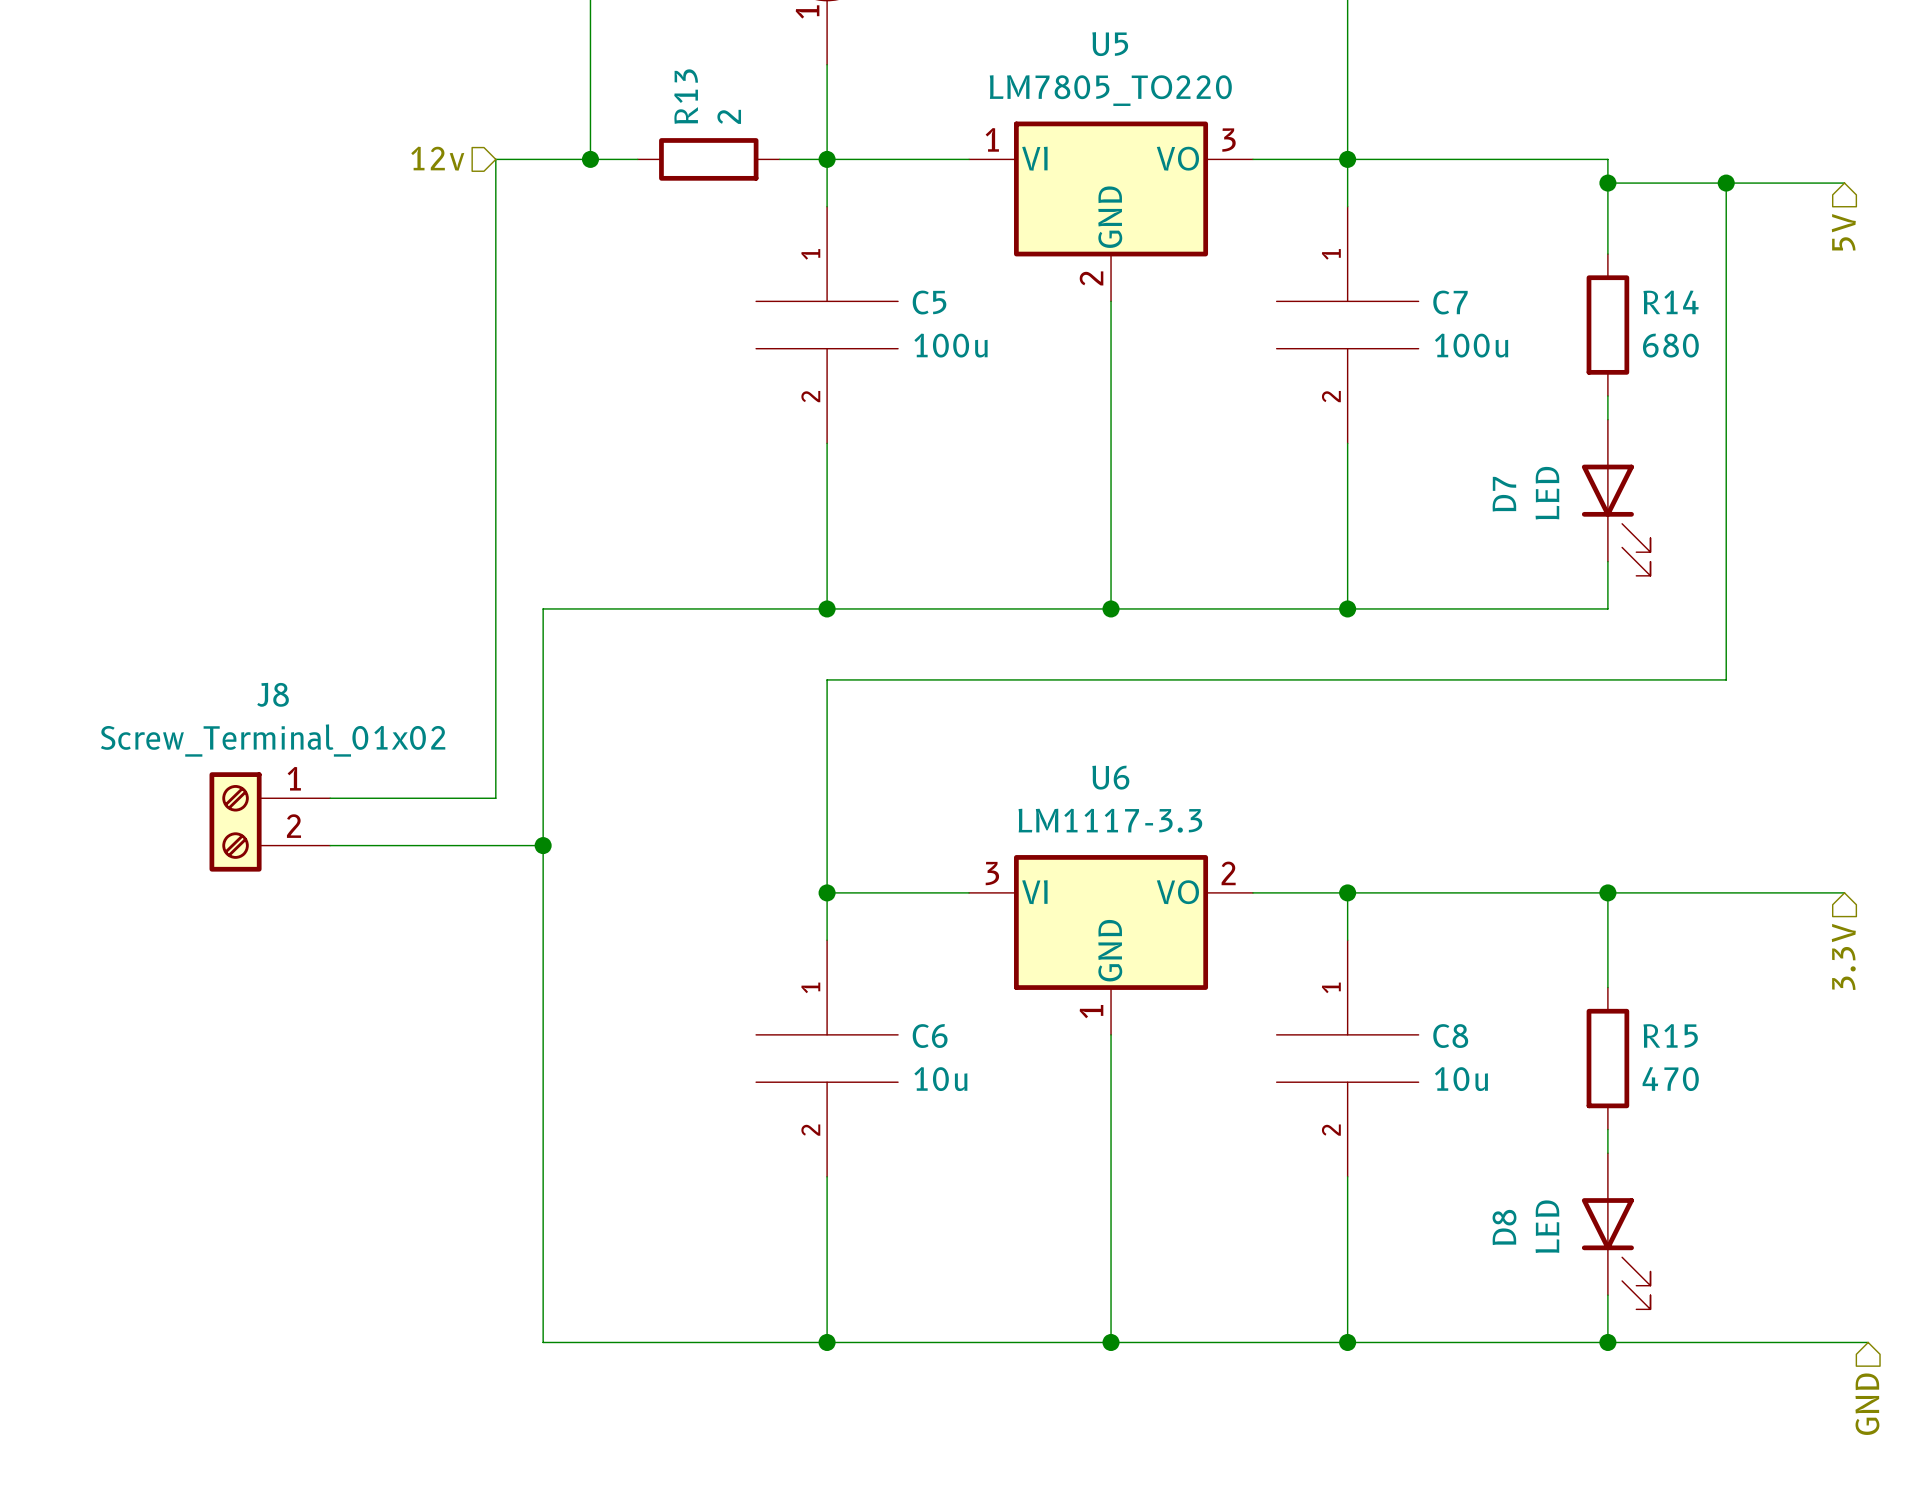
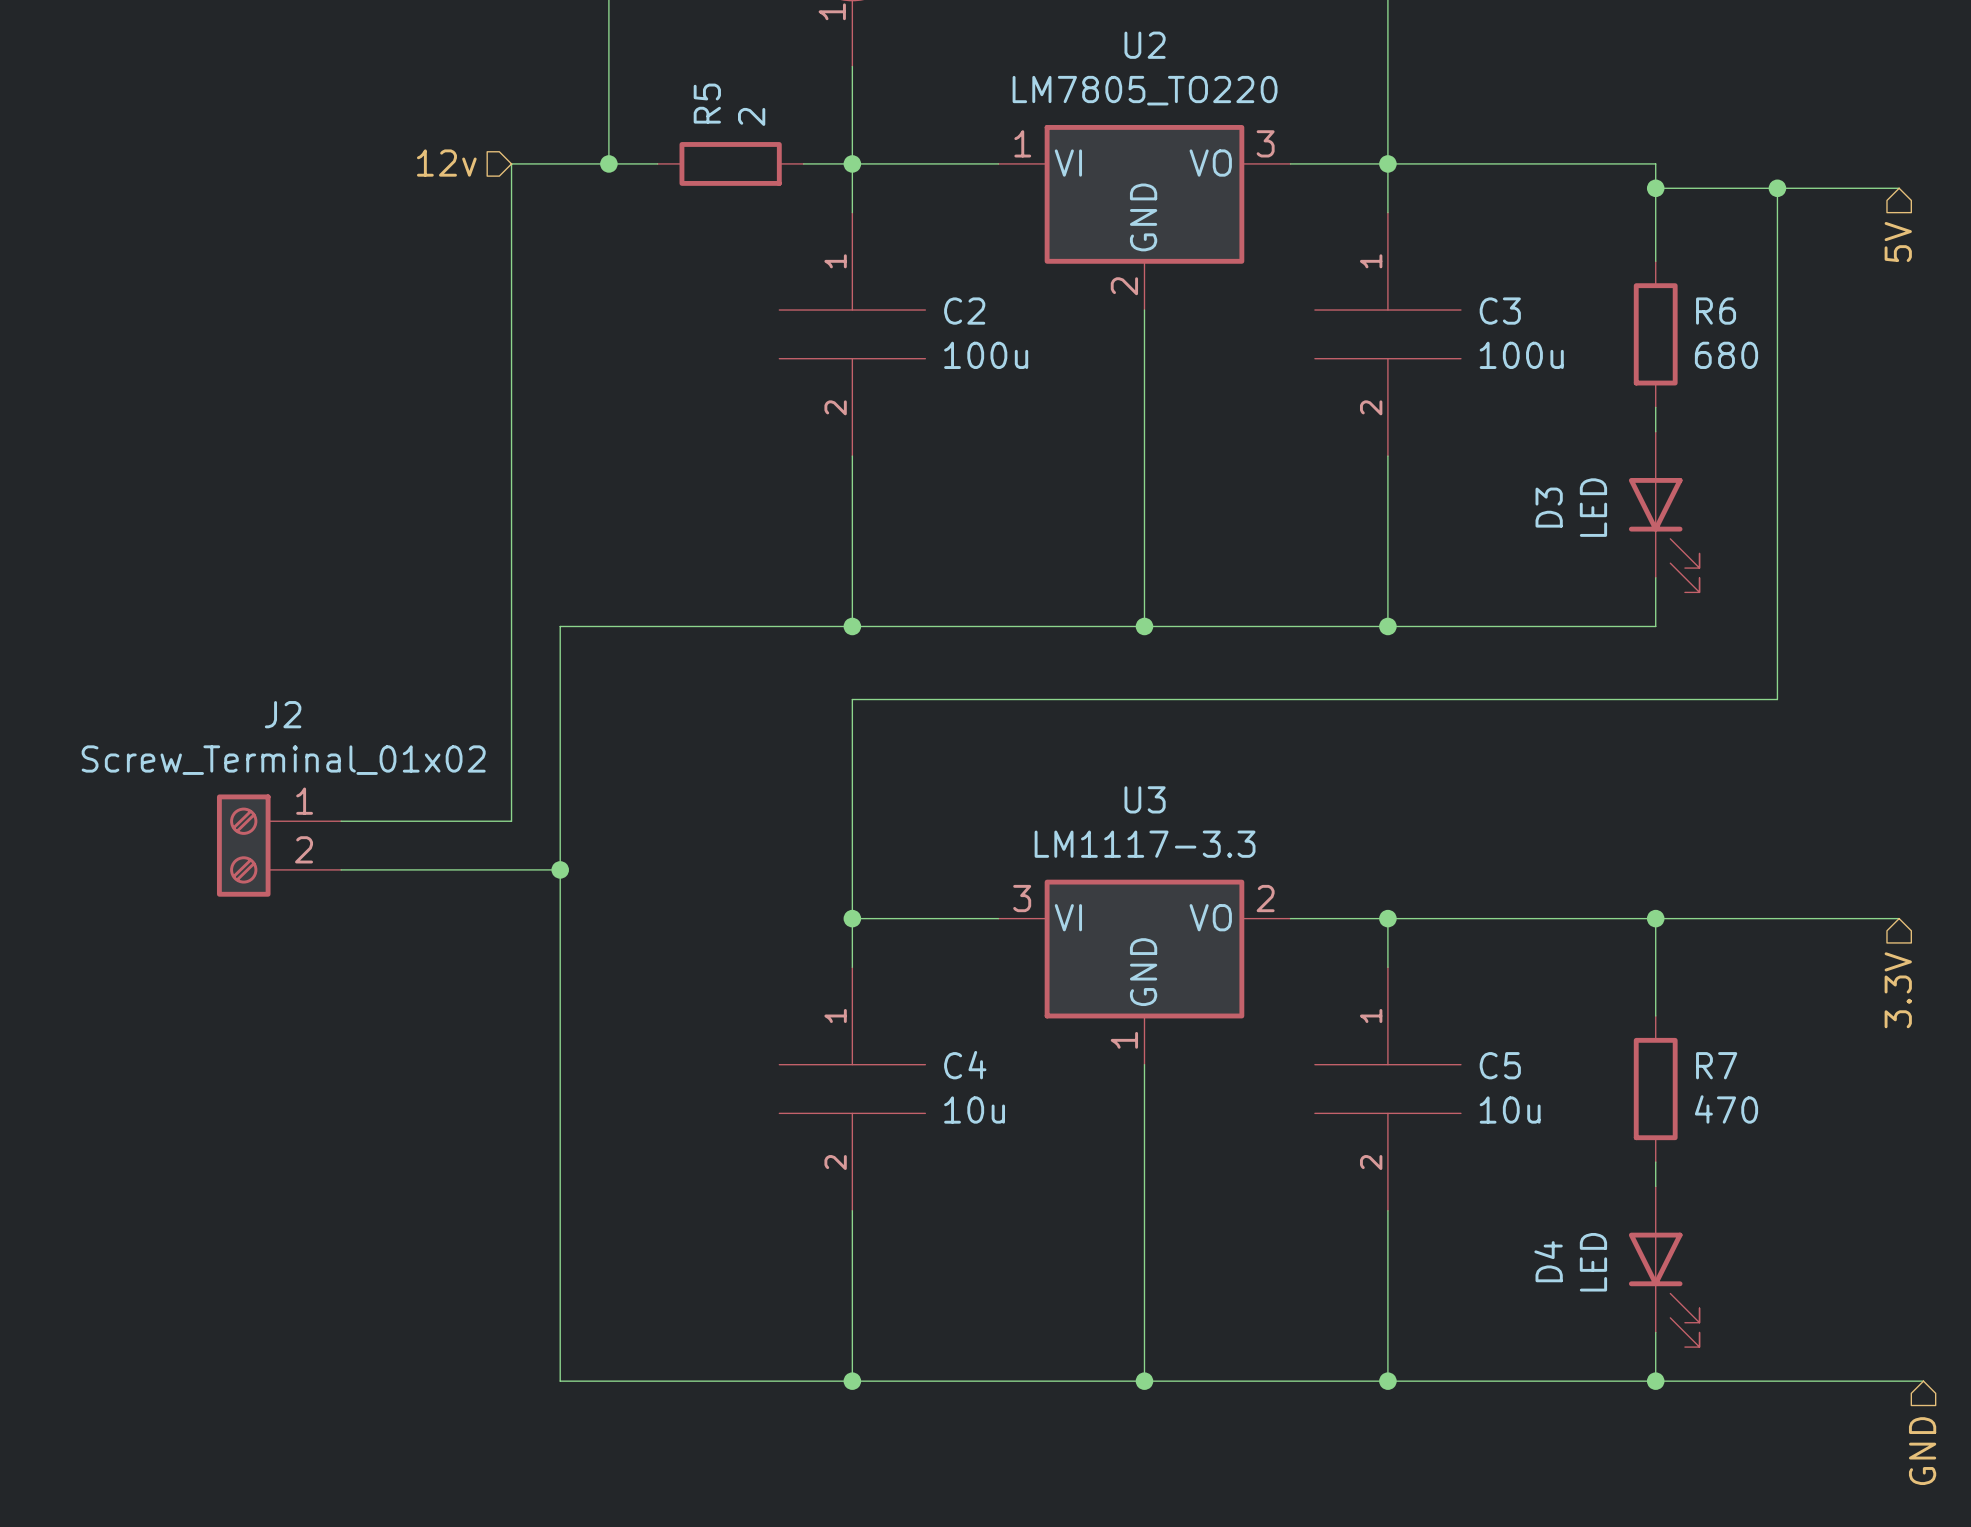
U5 name: U5 (1110, 44) -> U2 (1145, 45)
R13 name: R13 (686, 96) -> R5 (707, 103)
C5 name: C5 (929, 302) -> C2 (964, 311)
C7 name: C7 (1450, 302) -> C3 (1500, 311)
R14 name: R14 (1671, 302) -> R6 (1716, 311)
D7 name: D7 (1504, 494) -> D3 (1549, 507)
J8 name: J8 (273, 694) -> J2 (283, 714)
U6 name: U6 (1110, 777) -> U3 (1145, 799)
R15 name: R15 (1670, 1035) -> R7 (1716, 1065)
C6 name: C6 (930, 1036) -> C4 (965, 1065)
C8 name: C8 (1450, 1036) -> C5 (1500, 1065)
D8 name: D8 (1504, 1227) -> D4 (1548, 1261)

